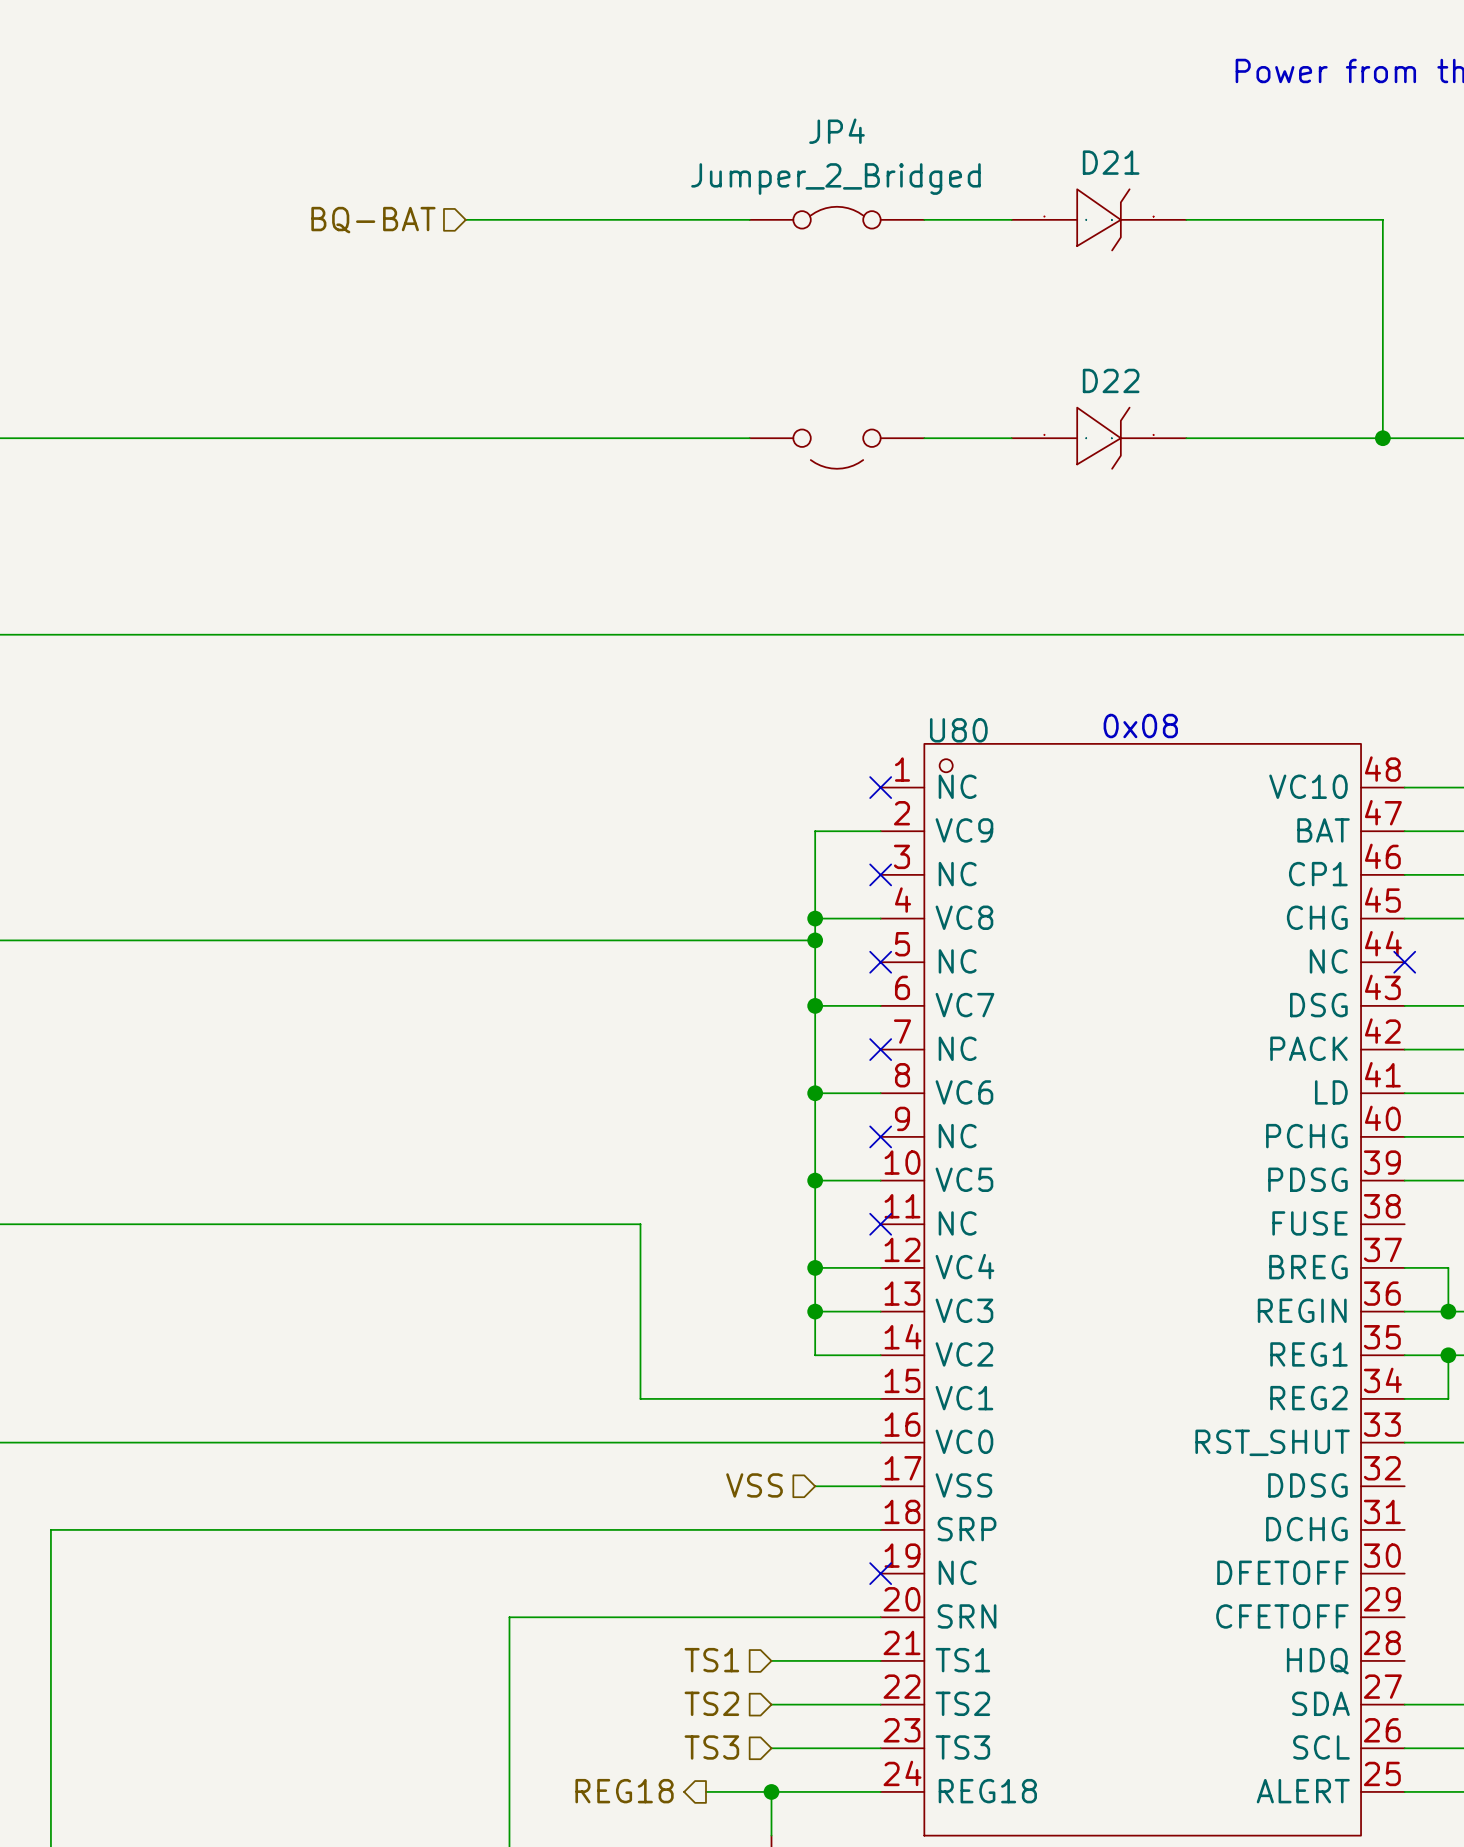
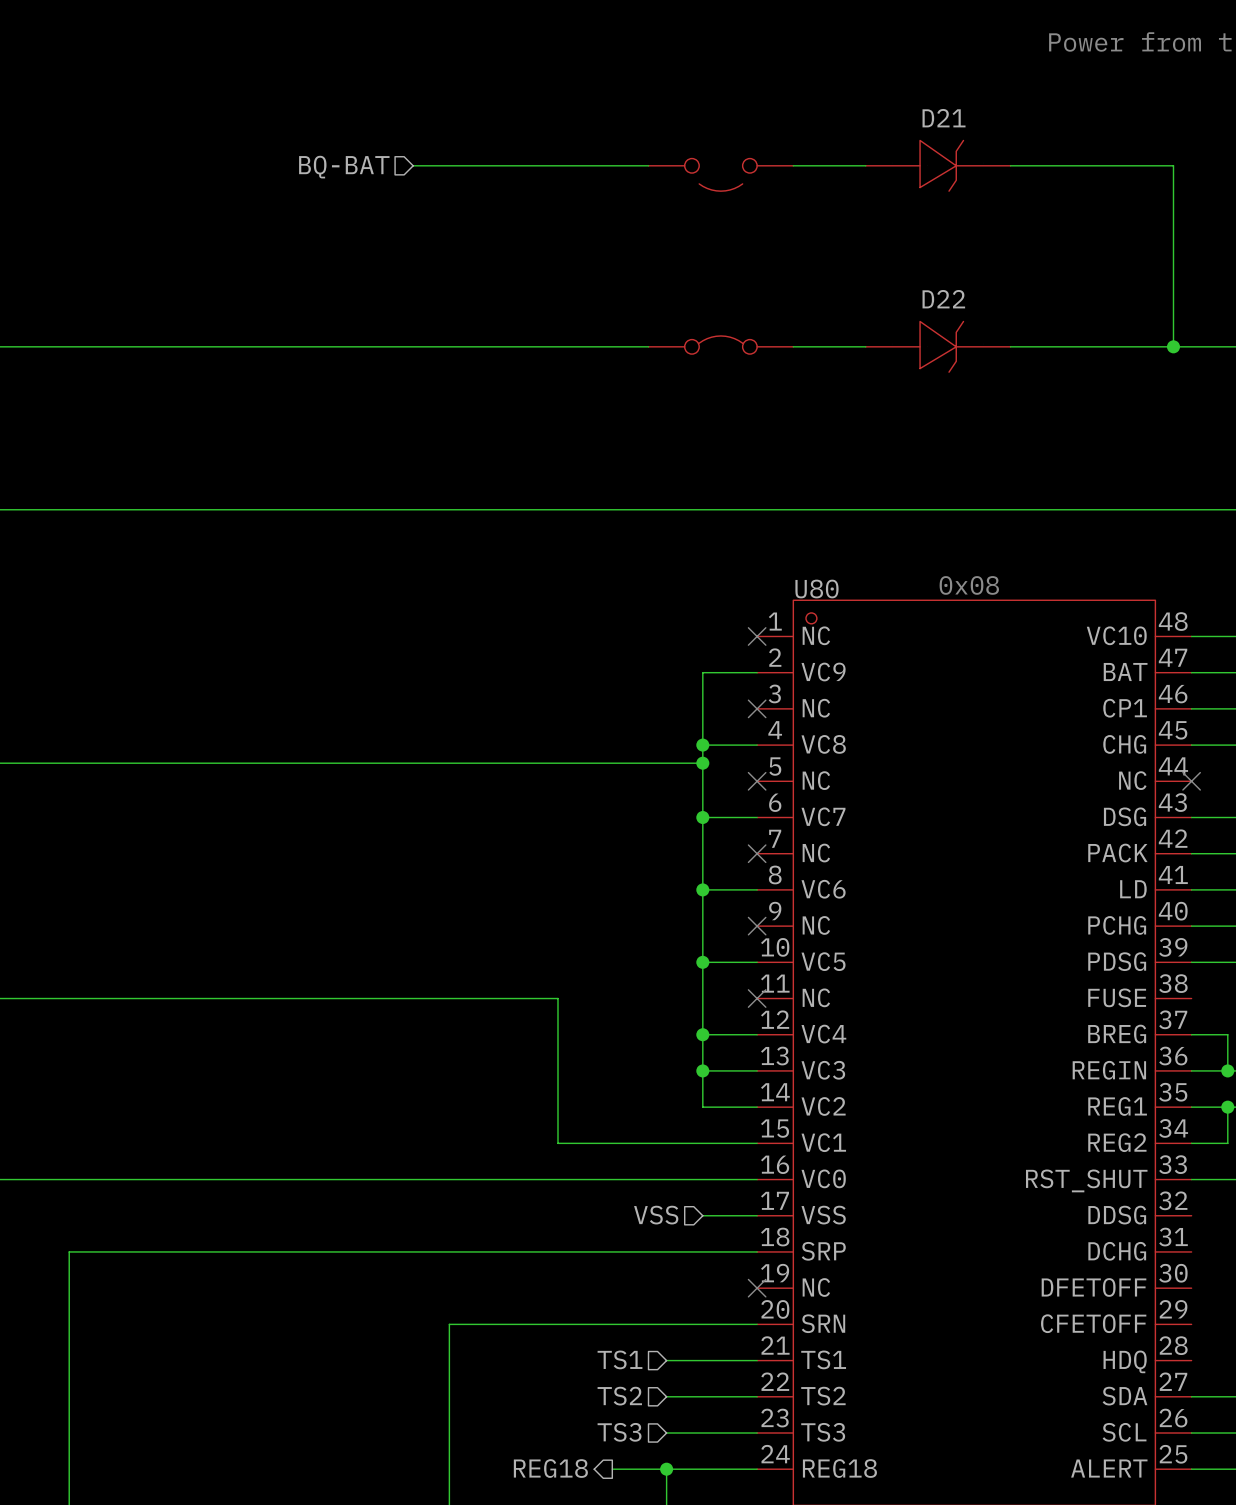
JP4: Jumper_2_Bridged (837, 217) -> none
part: none -> (720, 174)
part symbol: [749, 429, 925, 469] -> [648, 335, 794, 355]

